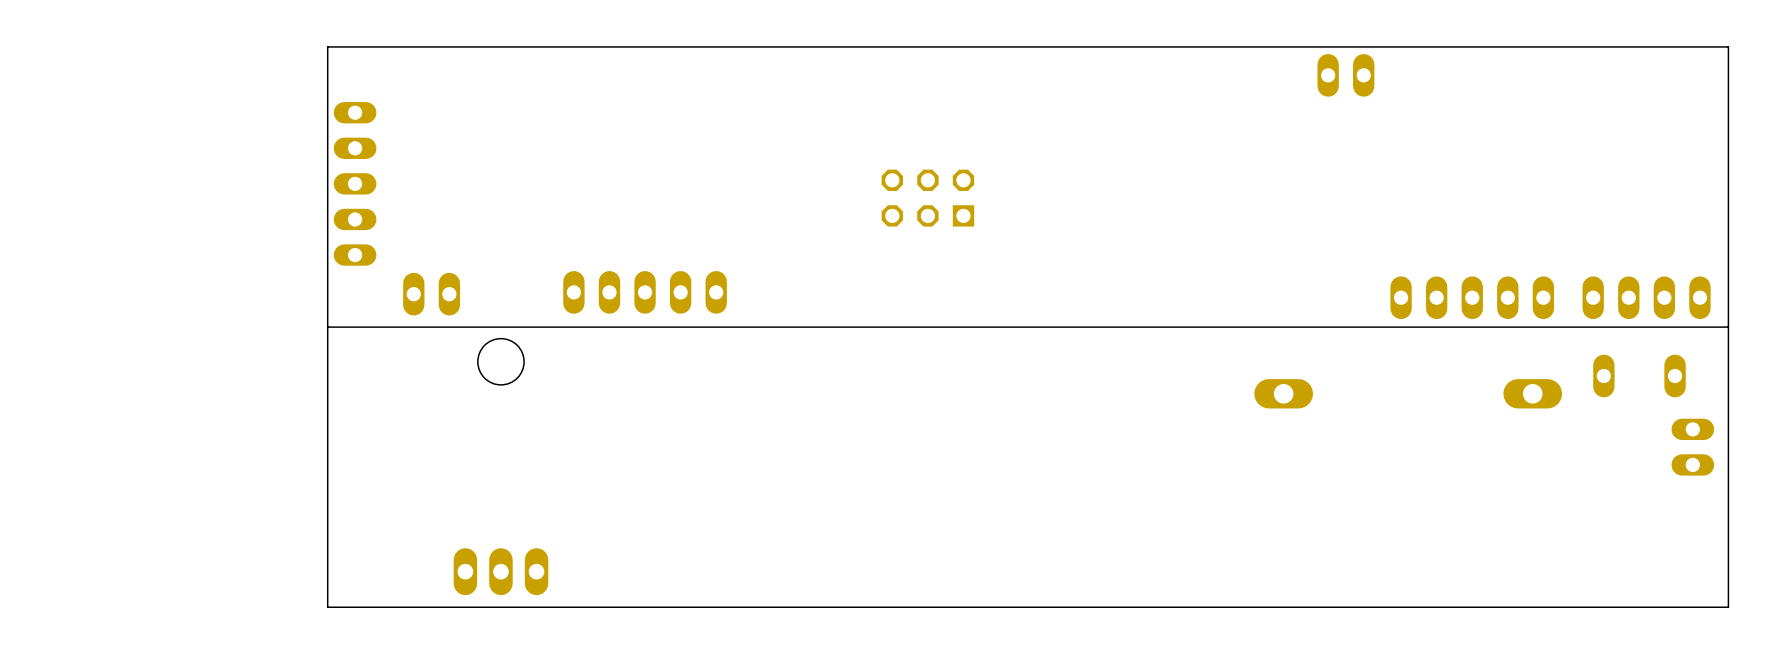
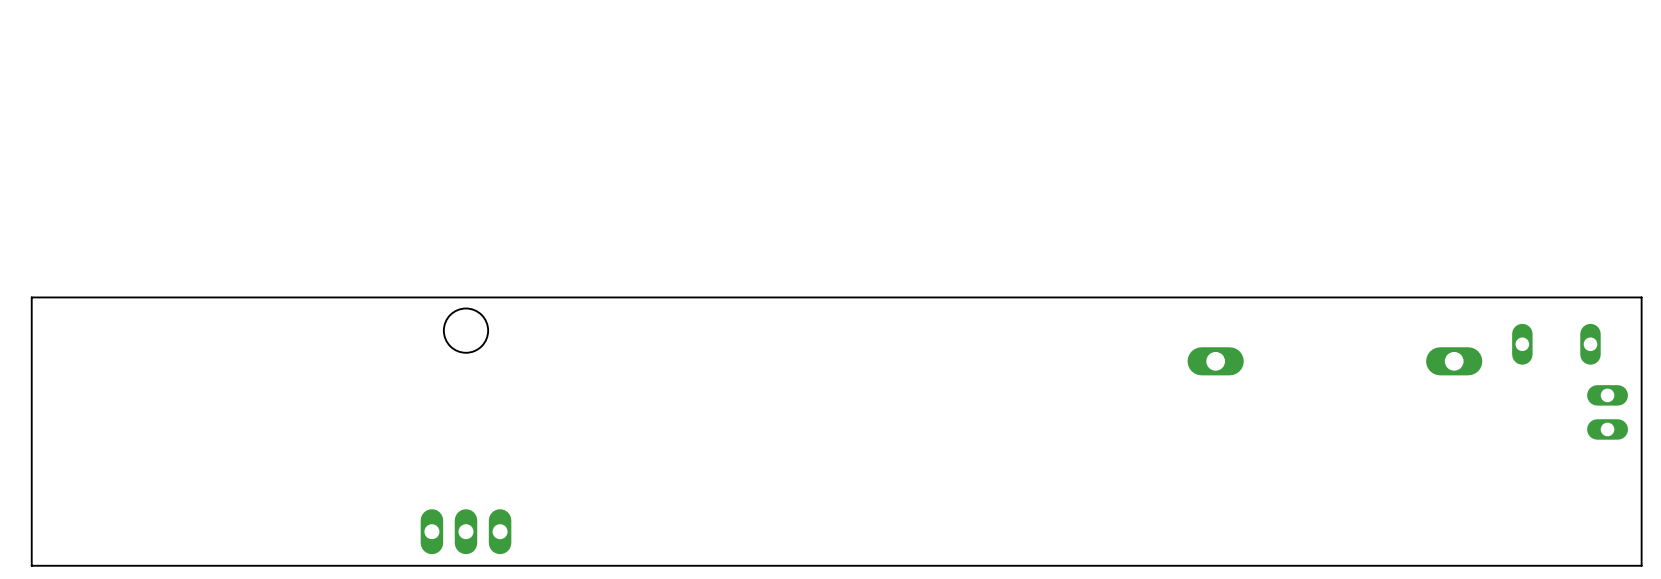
part: (1345, 75) -> none
part: (355, 183) -> none
part: (927, 198) -> none
part: (645, 292) -> none
part: (431, 294) -> none
part: (1472, 297) -> none
part: (1646, 297) -> none
board edge: (1728, 327) (1728, 46) (327, 46) (327, 607) -> (300, 297) (31, 297) (31, 565) (300, 565)

